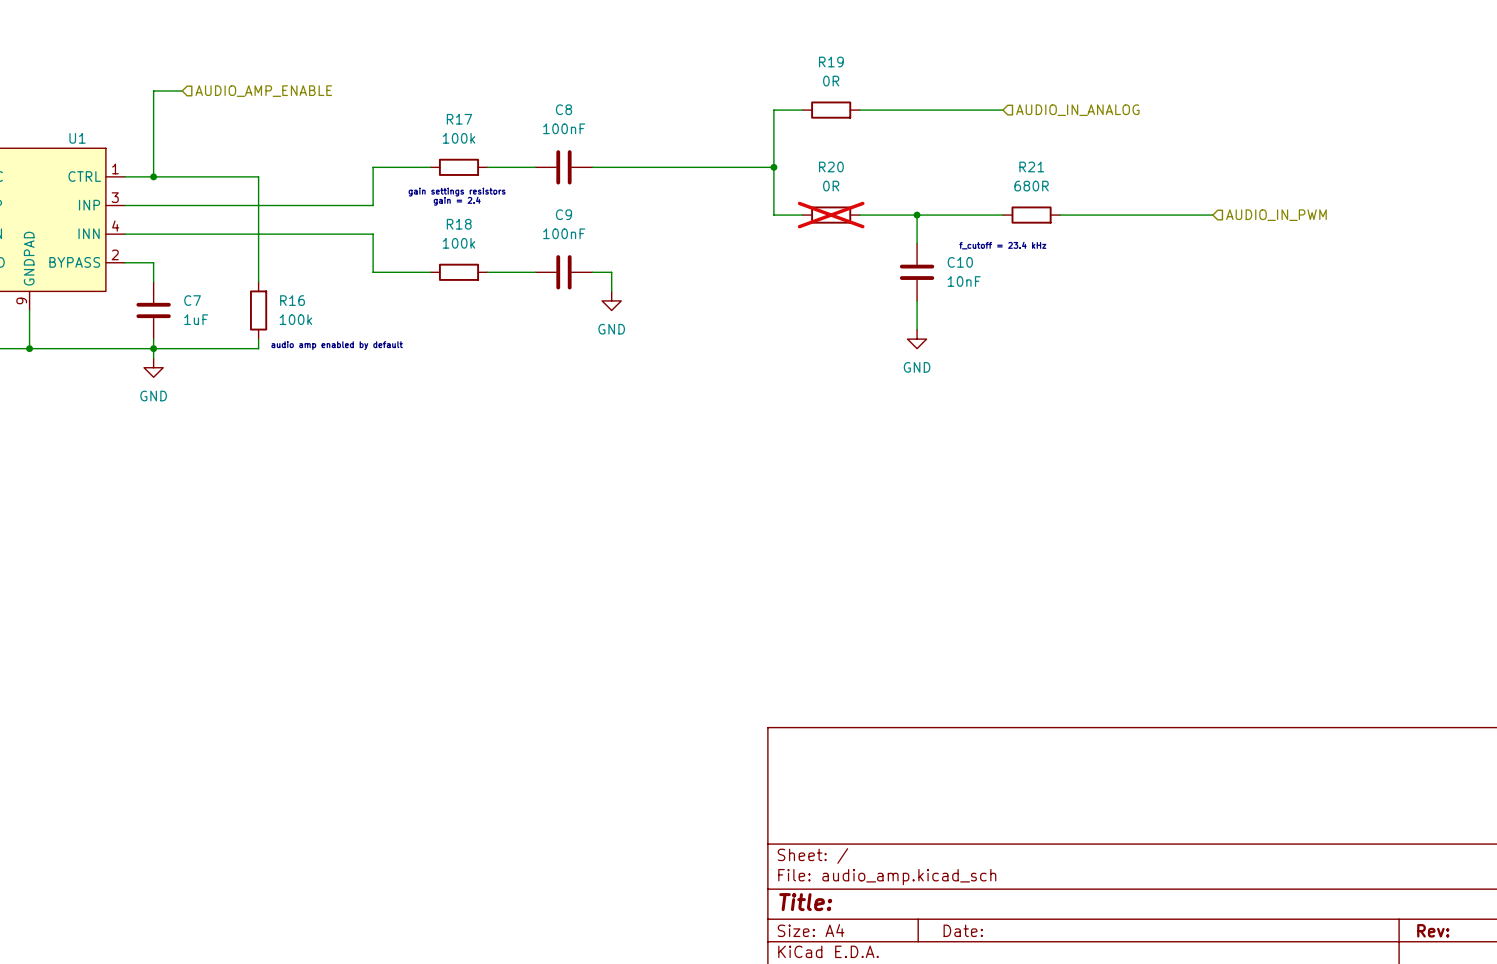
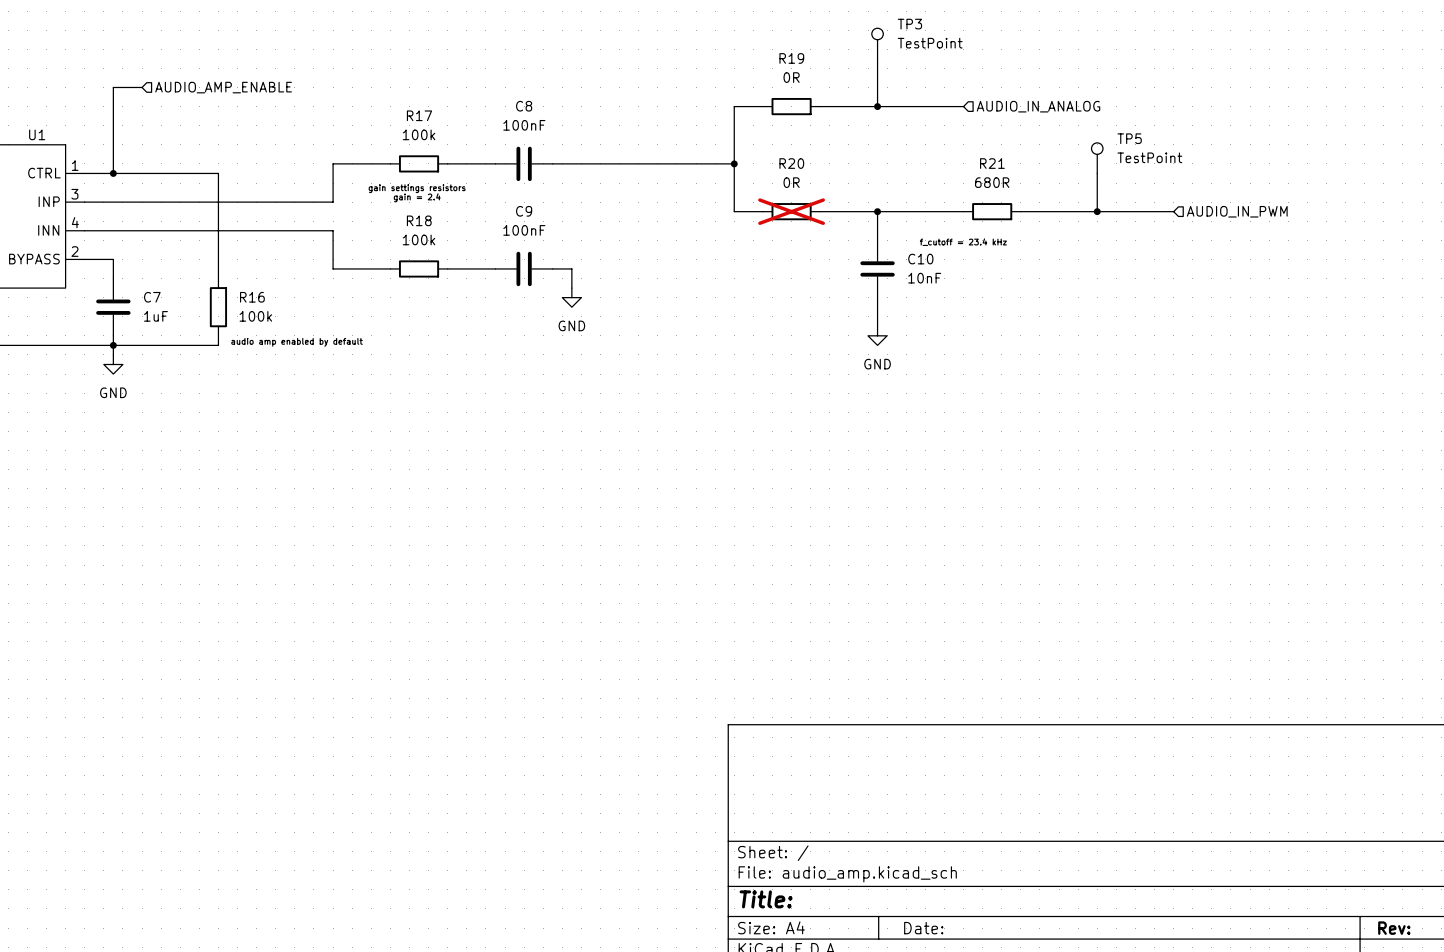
TP3: none -> TestPoint (877, 43)
wire: none -> (877, 58) (877, 106)
junction: none -> (877, 106)
TP5: none -> TestPoint (1097, 158)
wire: none -> (1097, 173) (1097, 211)
junction: none -> (1097, 211)

